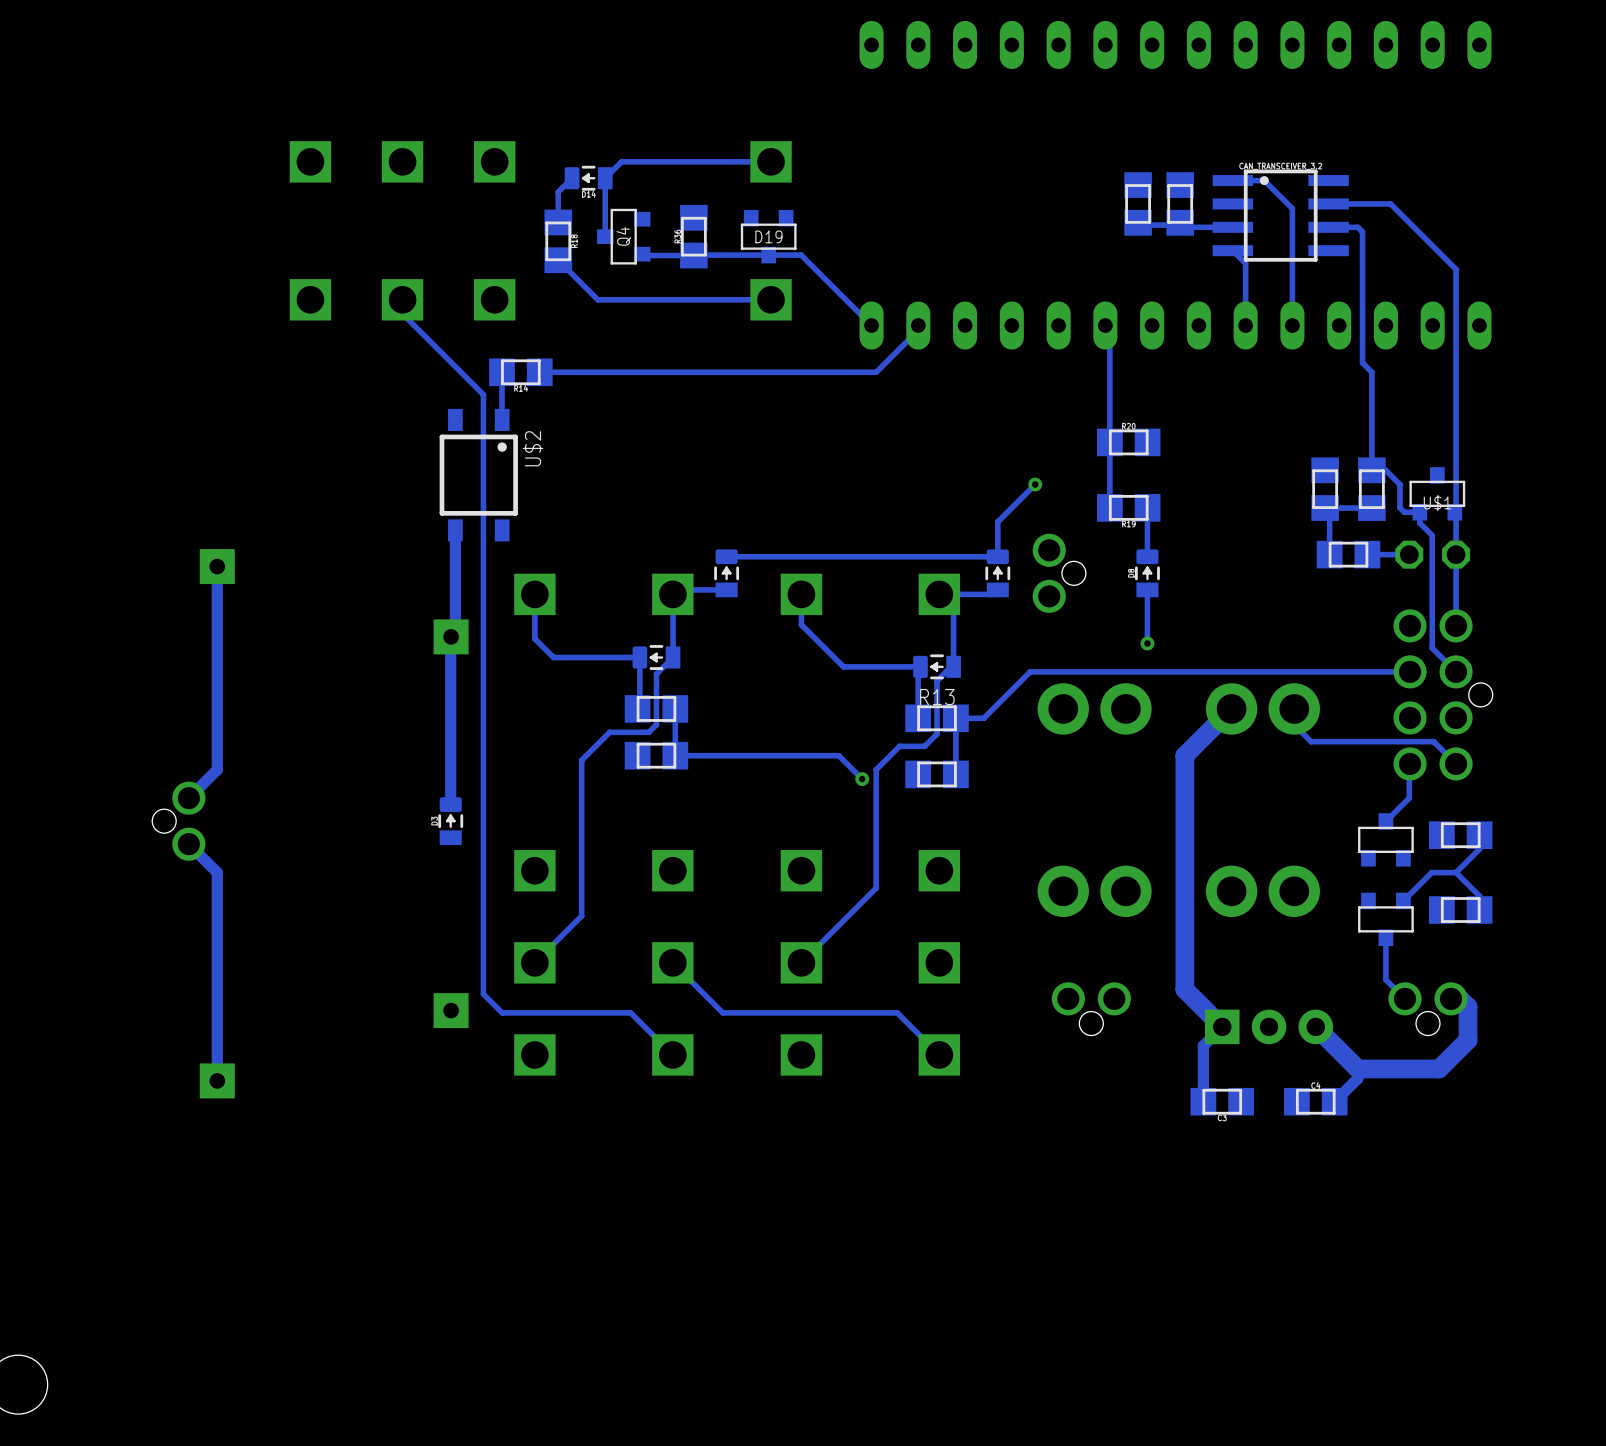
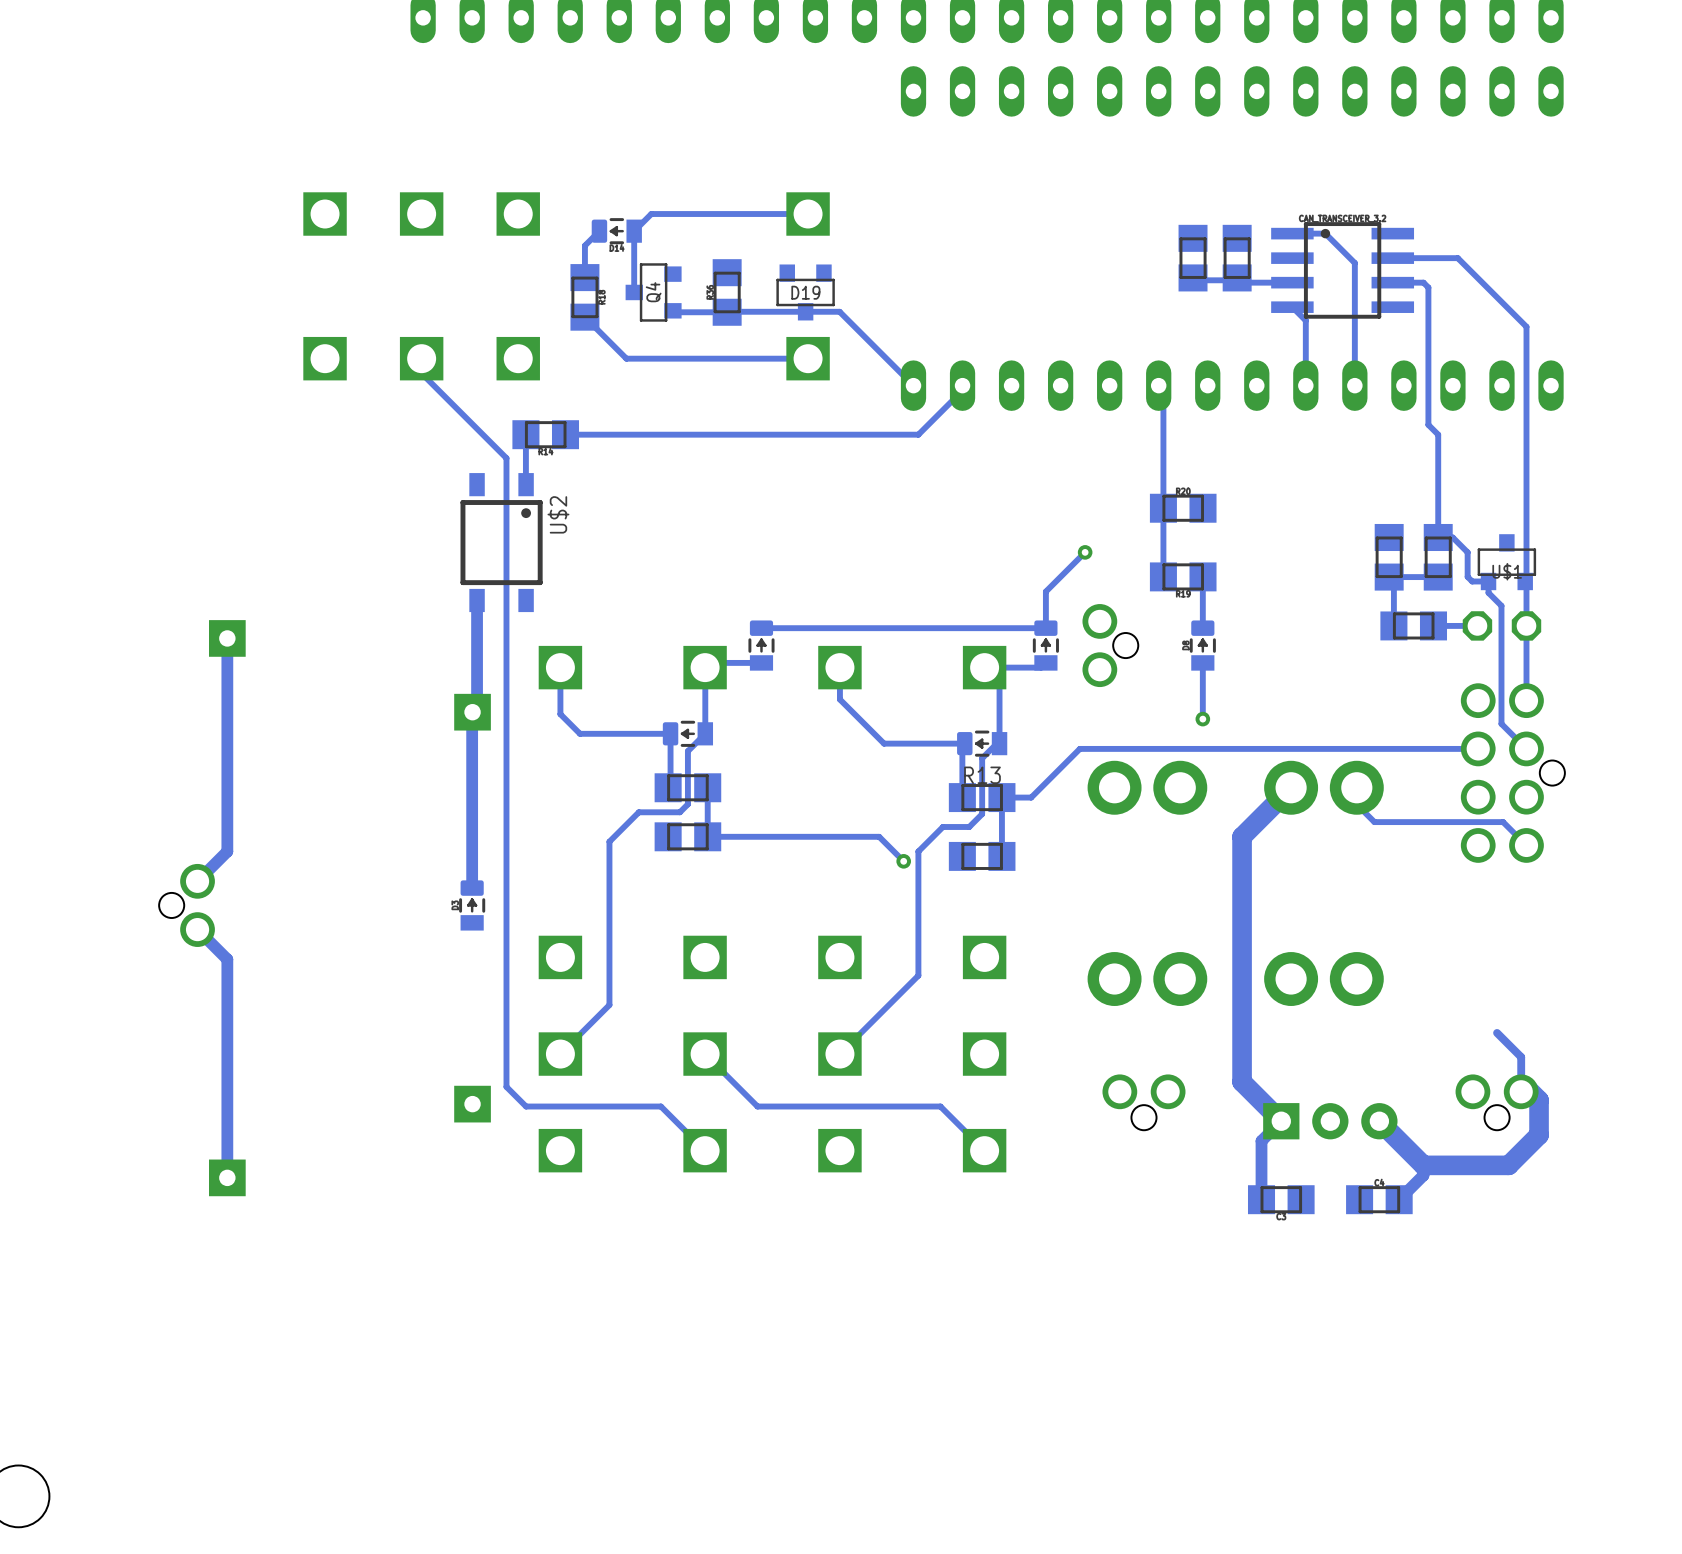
track: (1409, 764) (1409, 798) (1385, 821) -> none
part: (1460, 835) -> none
track: (1479, 835) (1479, 849) (1456, 872) -> none
part: (1385, 839) -> none
track: (1456, 872) (1431, 872) (1403, 900) -> none
track: (1456, 872) (1479, 896) (1479, 910) -> none
part: (1460, 910) -> none
part: (1385, 919) -> none
track: (1385, 937) (1385, 979) (1404, 998) -> none
track: none -> (1497, 1032) (1521, 1057) (1521, 1091)

